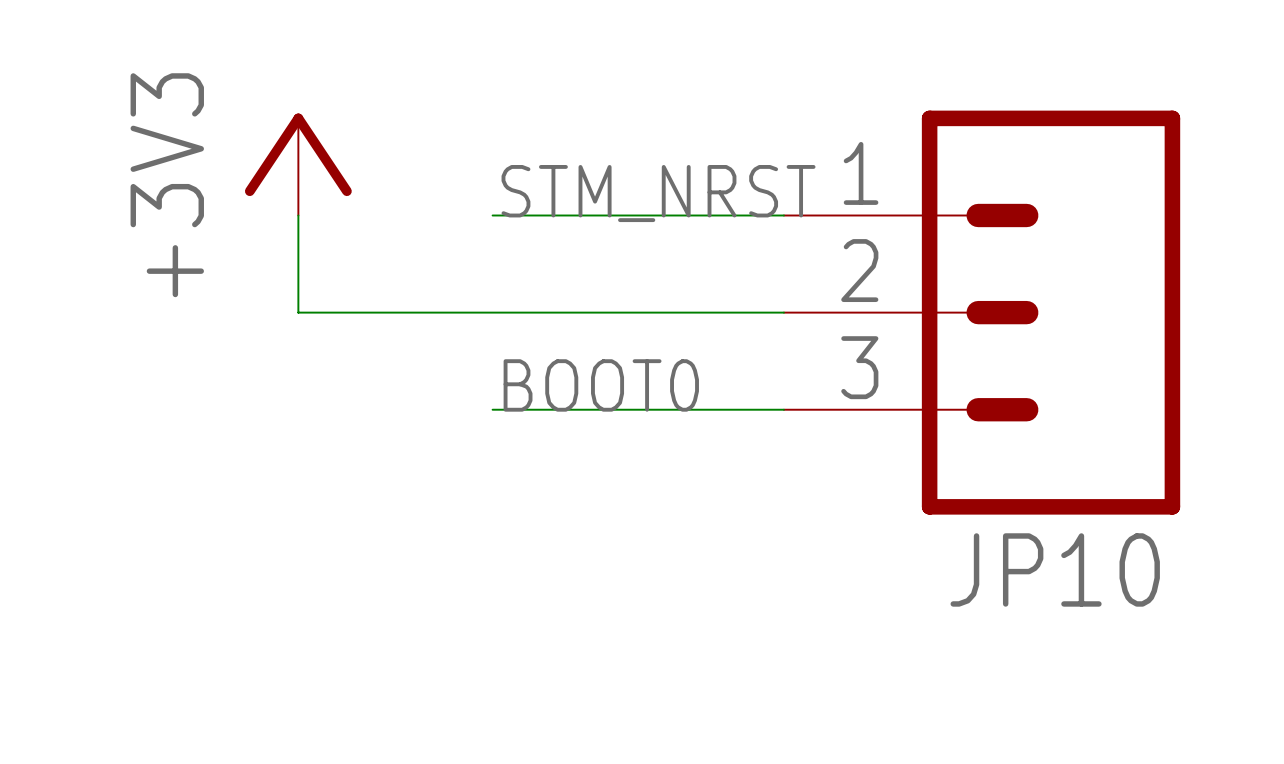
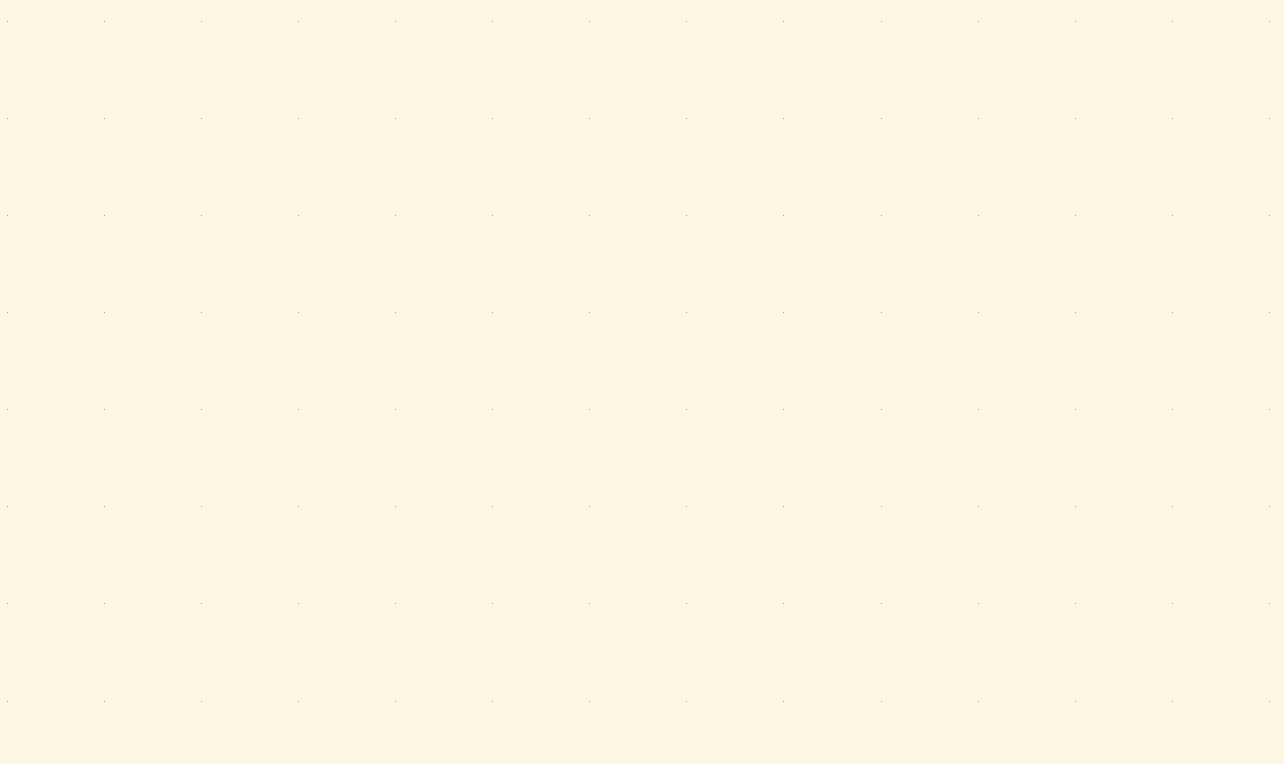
power symbol: +3V3 (298, 164) -> none
label: STM_NRST (658, 193) -> none
wire: (298, 215) (298, 312) (783, 312) -> none
wire: (492, 215) (783, 215) -> none
JP10: (982, 312) -> none
label: BOOT0 (601, 385) -> none
wire: (492, 409) (783, 409) -> none

